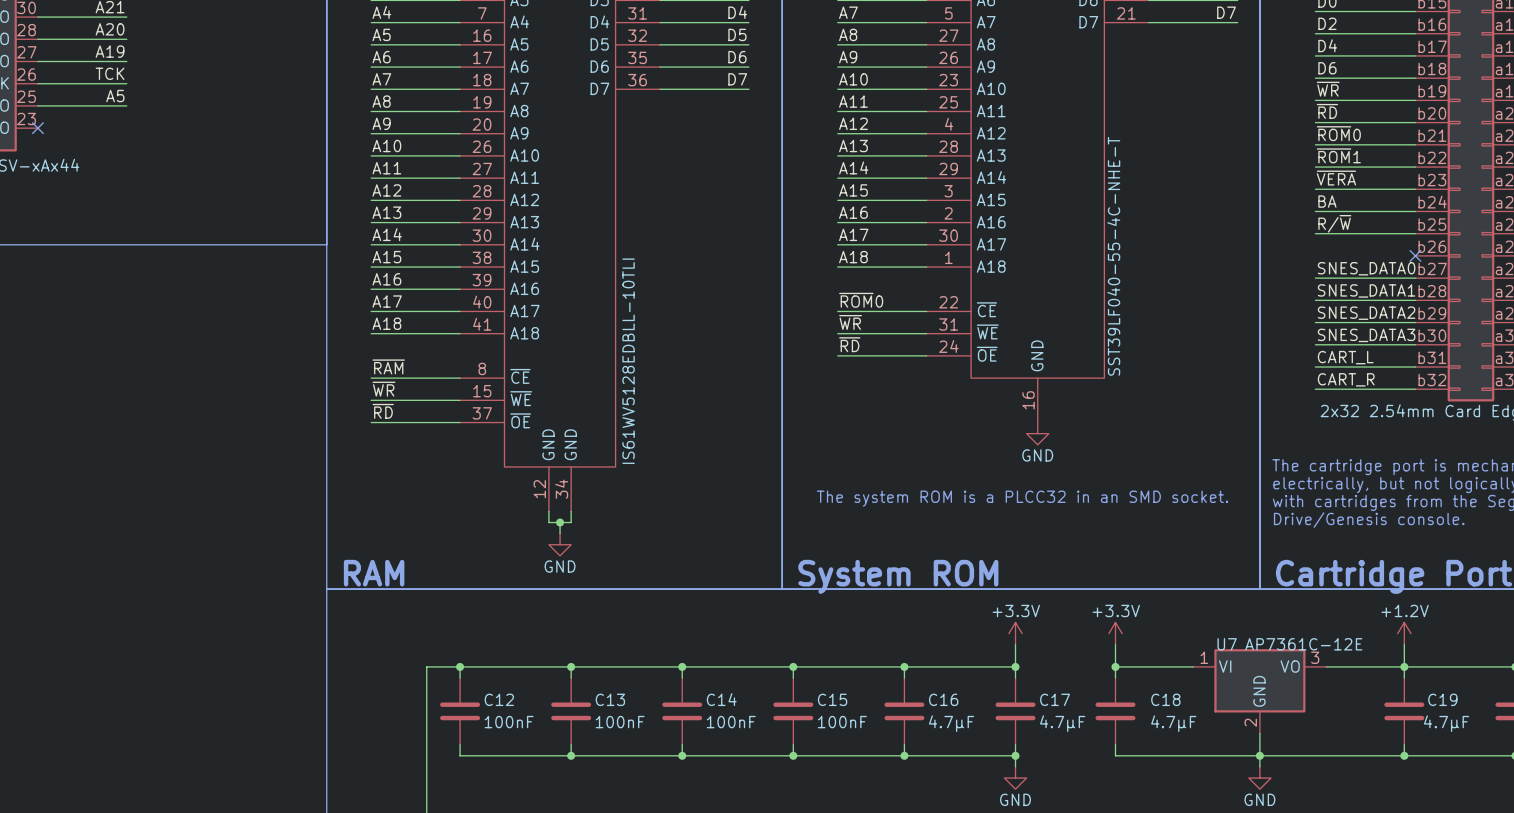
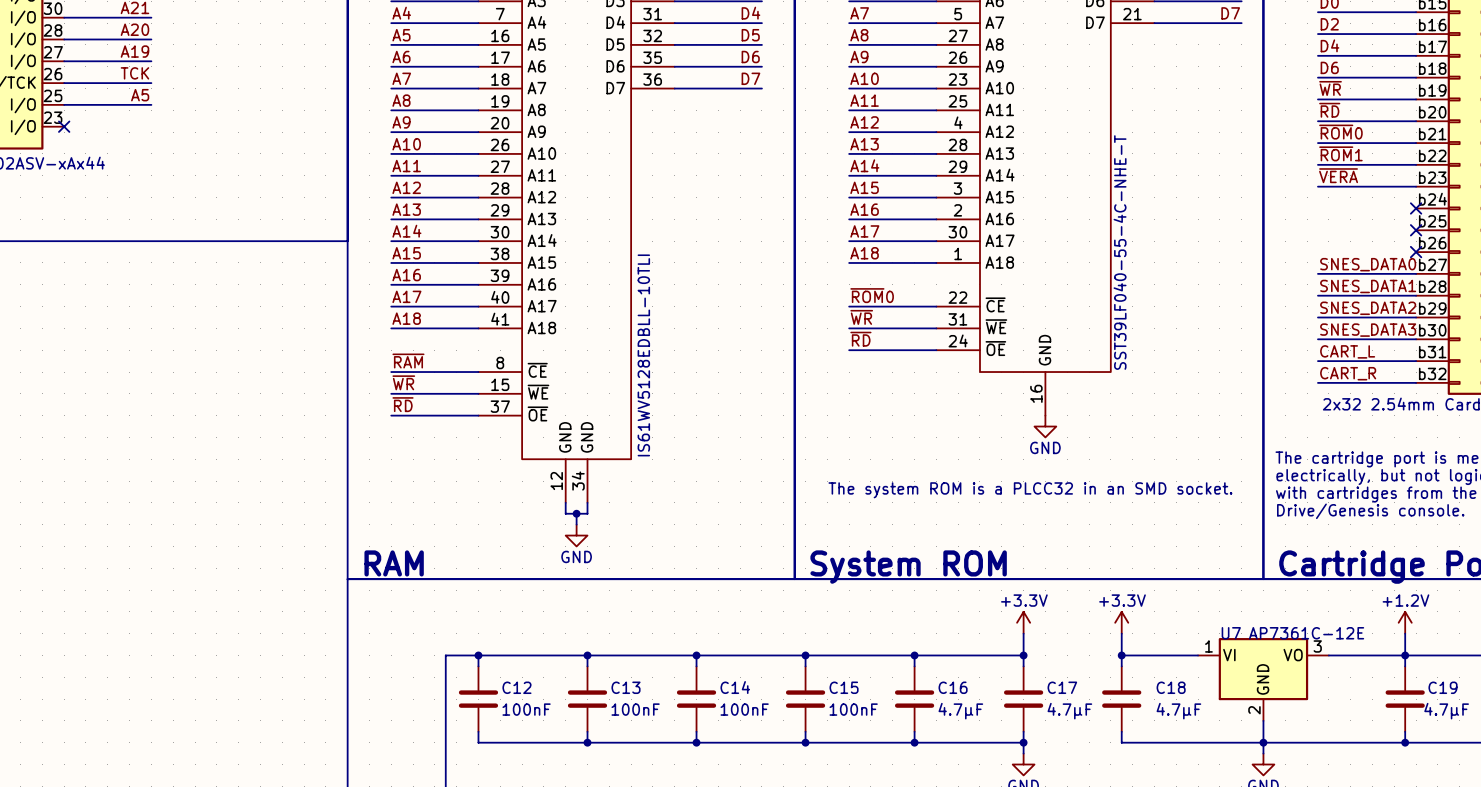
label: BA (1327, 201) -> none
wire: (1315, 211) (1415, 211) -> none
no-connect mark: none -> (1416, 208)
label: R/~{W} (1334, 223) -> none
wire: (1315, 233) (1415, 233) -> none
no-connect mark: none -> (1416, 230)

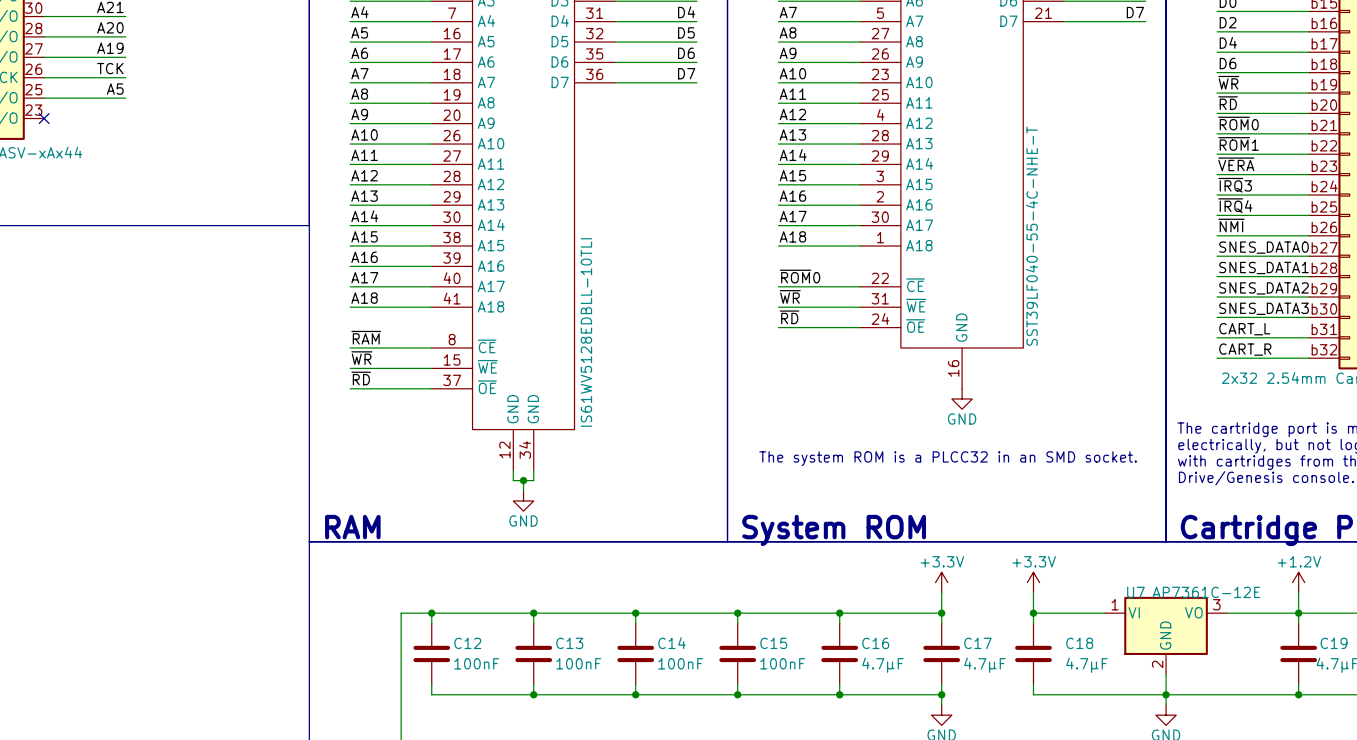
label: none -> ~{IRQ}3 (1235, 185)
wire: none -> (1217, 195) (1308, 195)
no-connect mark: (1416, 208) -> none
label: none -> ~{IRQ}4 (1235, 205)
wire: none -> (1217, 215) (1308, 215)
no-connect mark: (1416, 230) -> none
label: none -> ~{NMI} (1231, 225)
wire: none -> (1217, 235) (1308, 235)
no-connect mark: (1416, 252) -> none

